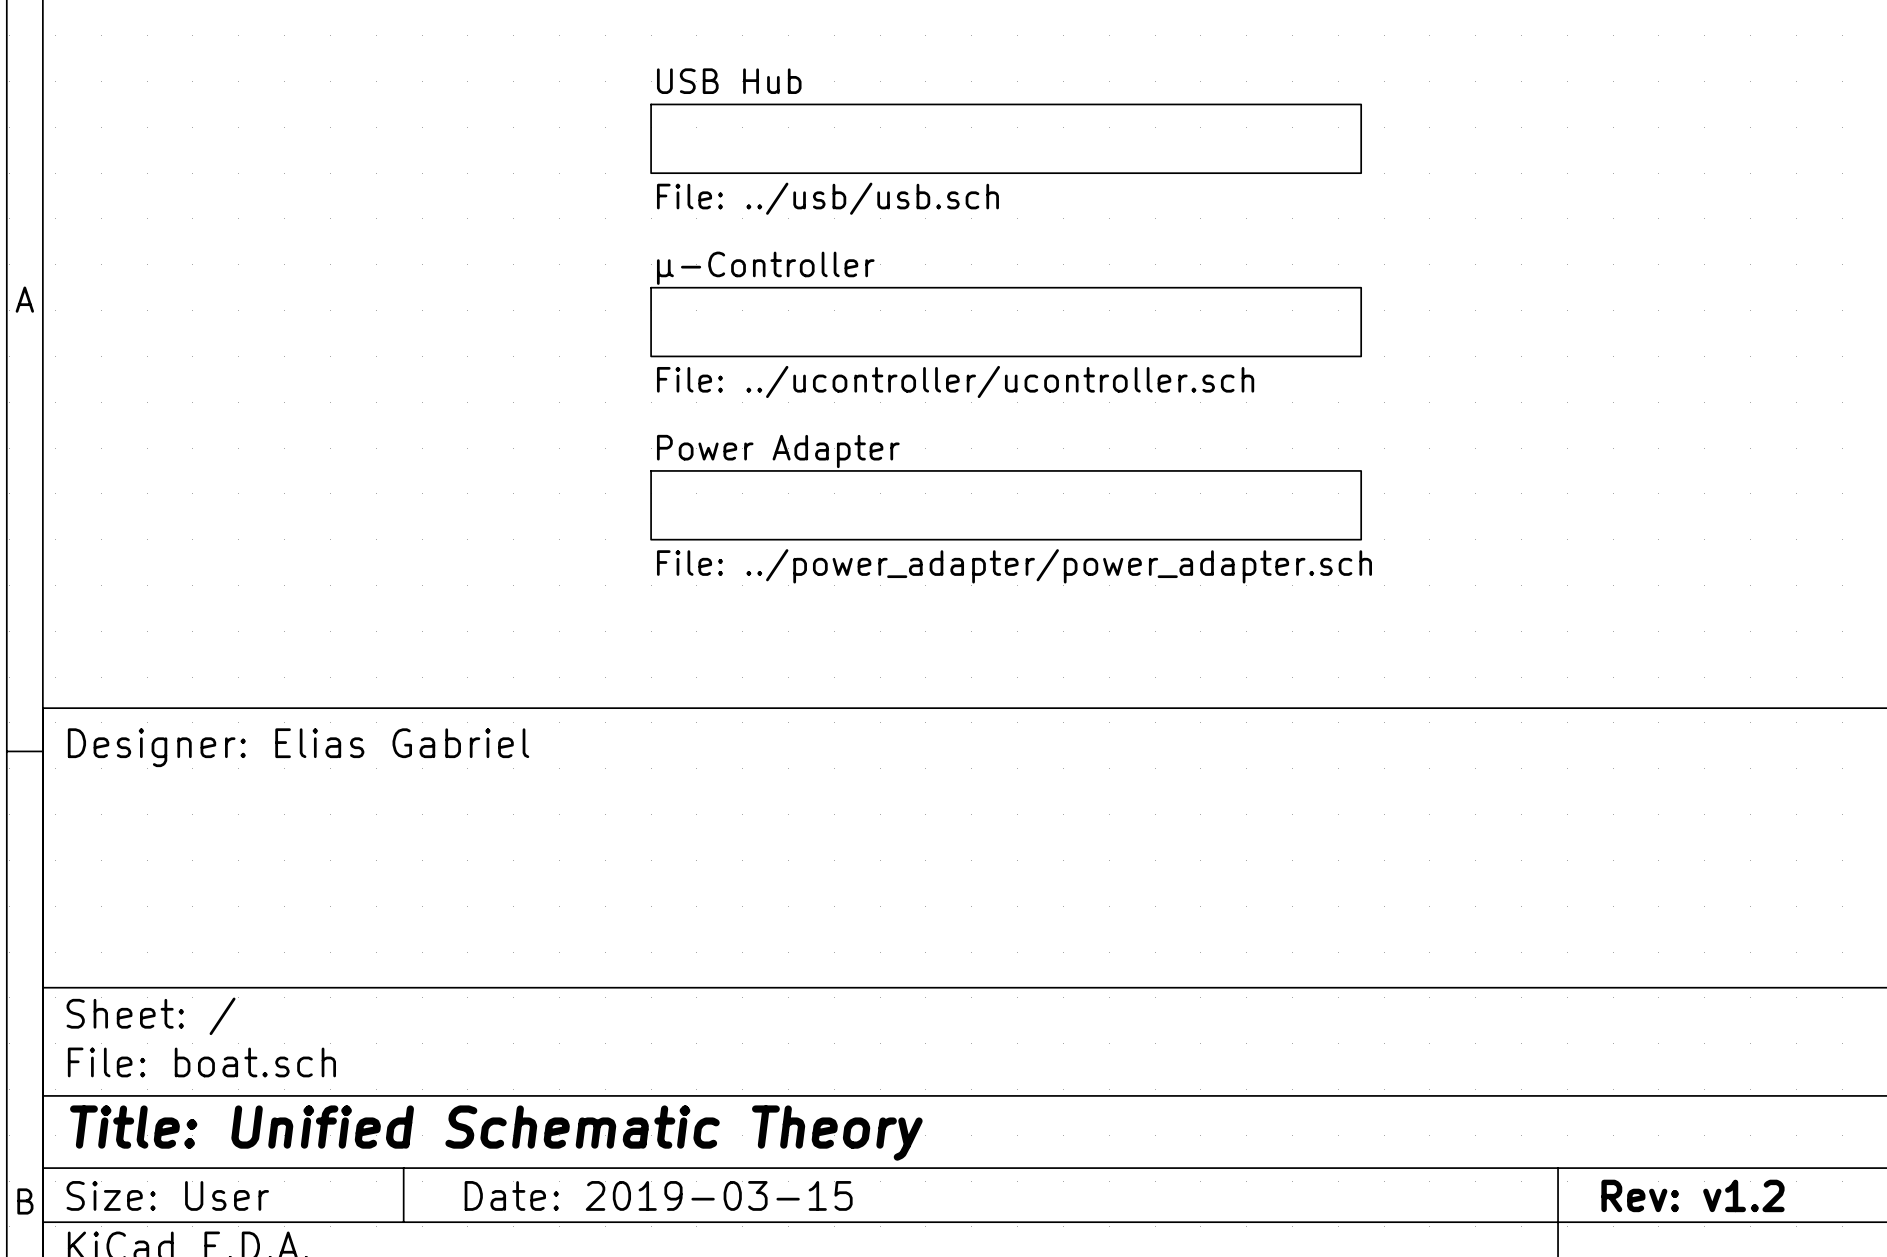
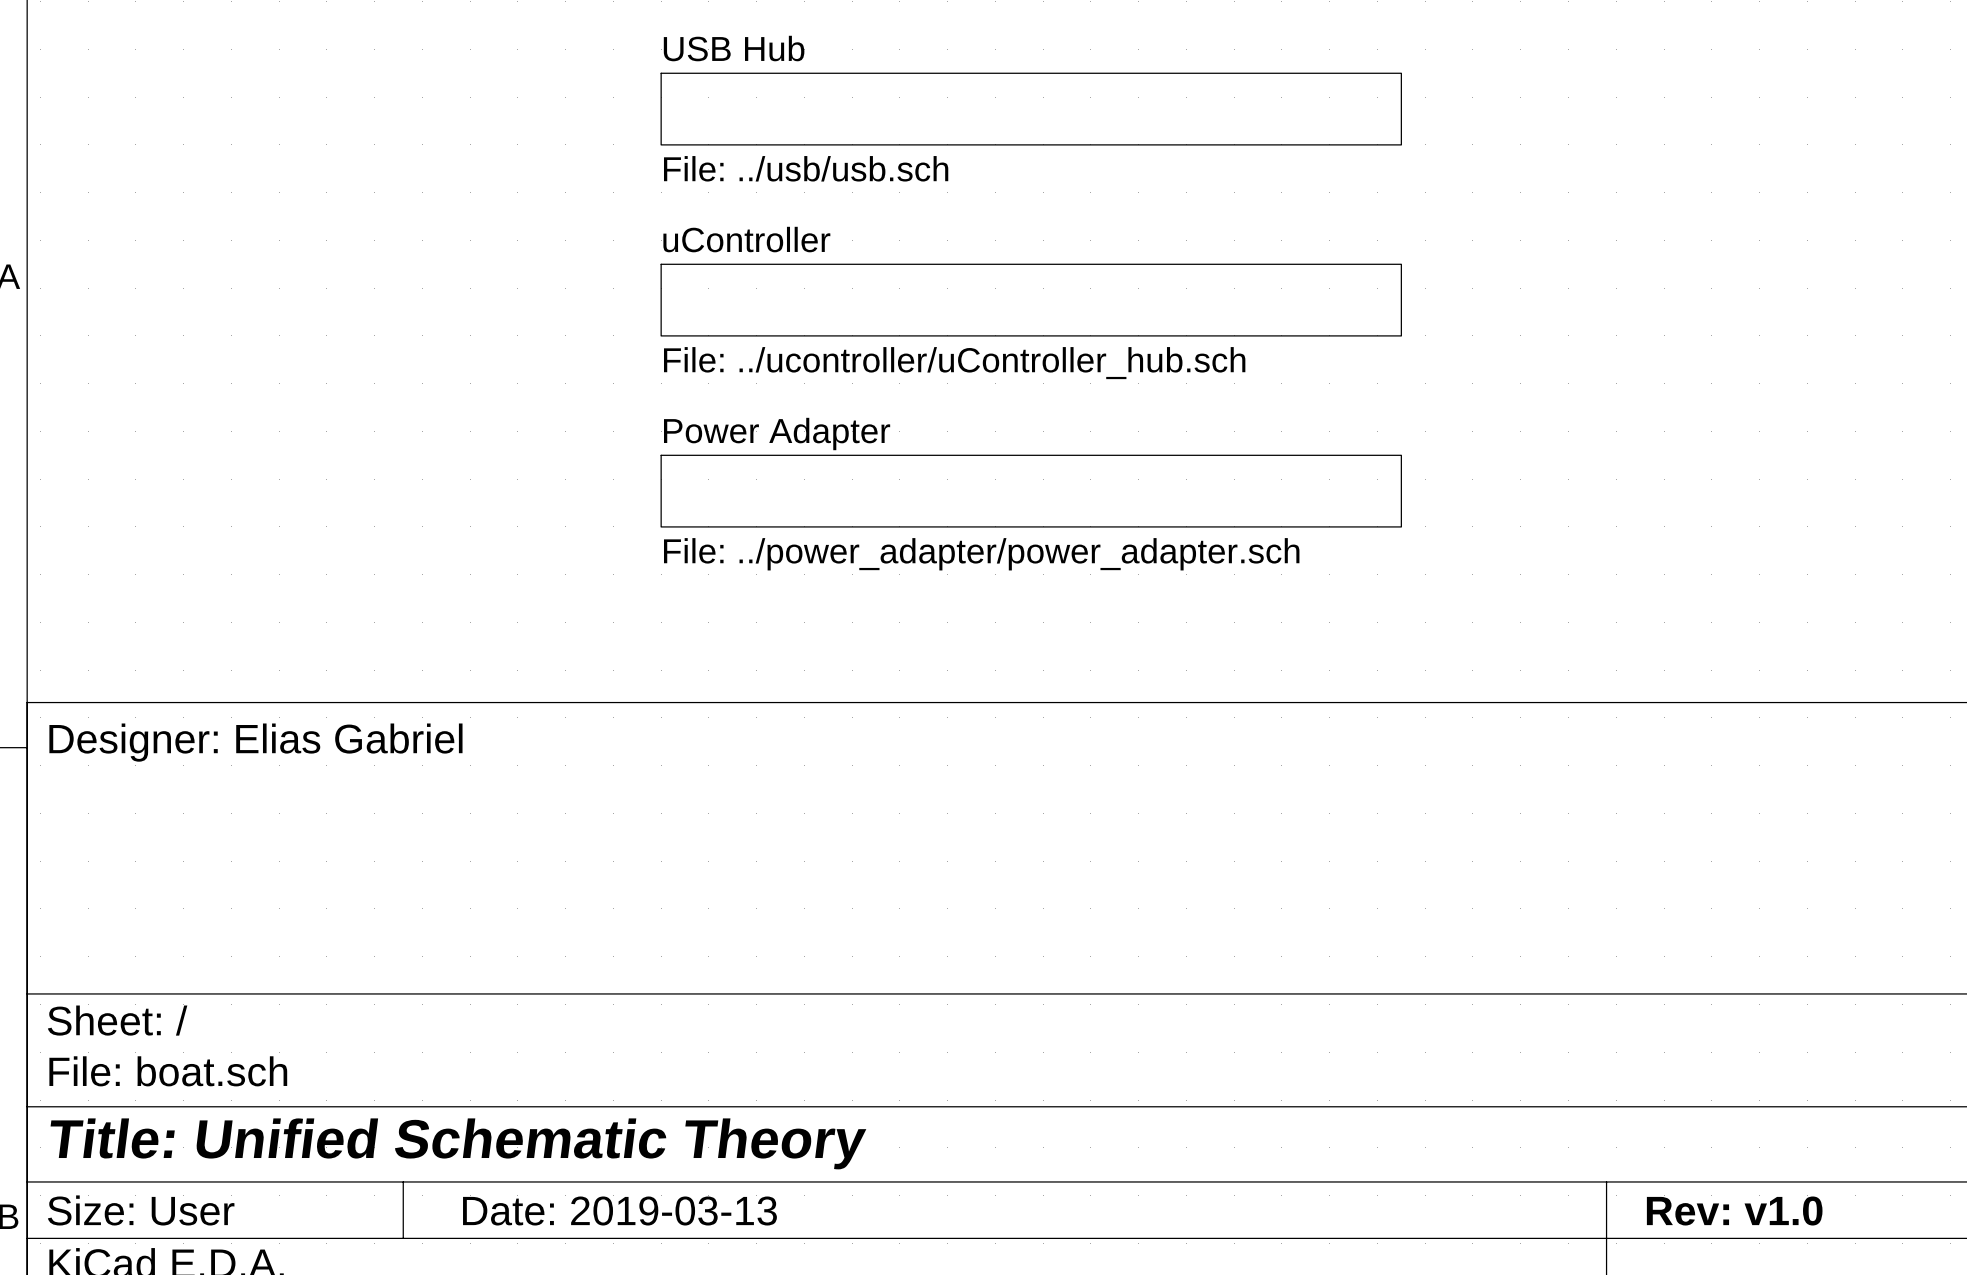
sheet μ-Controller name: μ-Controller (765, 268) -> uController (746, 239)
sheet μ-Controller value: File: ../ucontroller/ucontroller.sch (955, 381) -> File: ../ucontroller/uController_hub.sch (954, 363)
title block: Date: 2019-03-15 (658, 1195) -> Date: 2019-03-13 (619, 1211)
title block: Rev: v1.2 (1693, 1195) -> Rev: v1.0 (1734, 1211)

